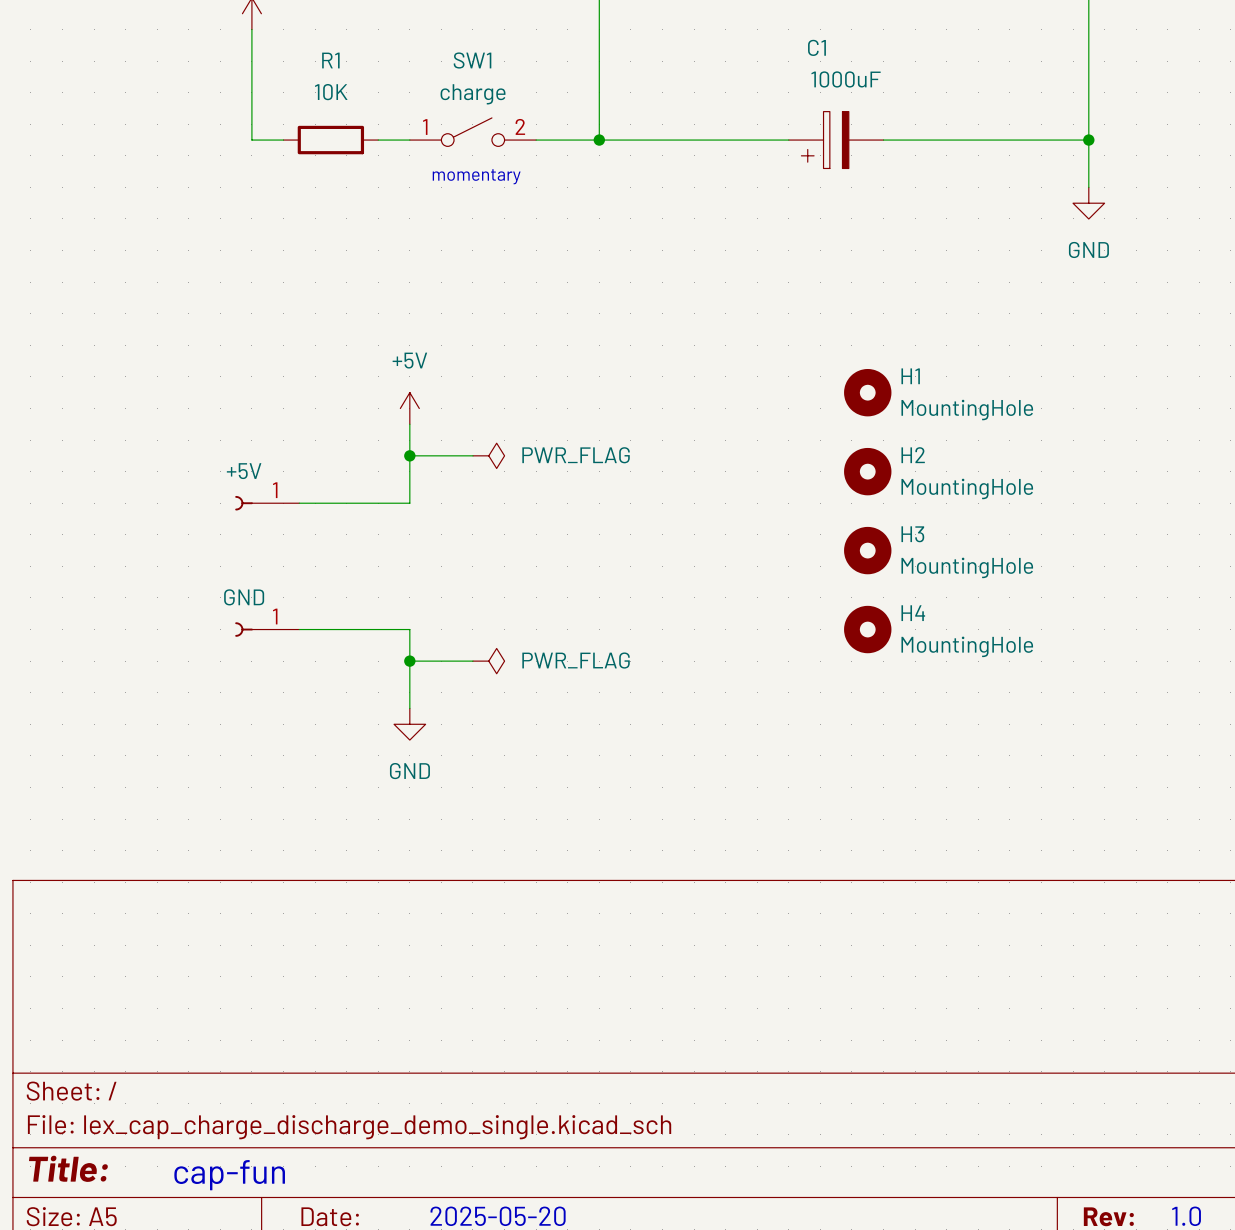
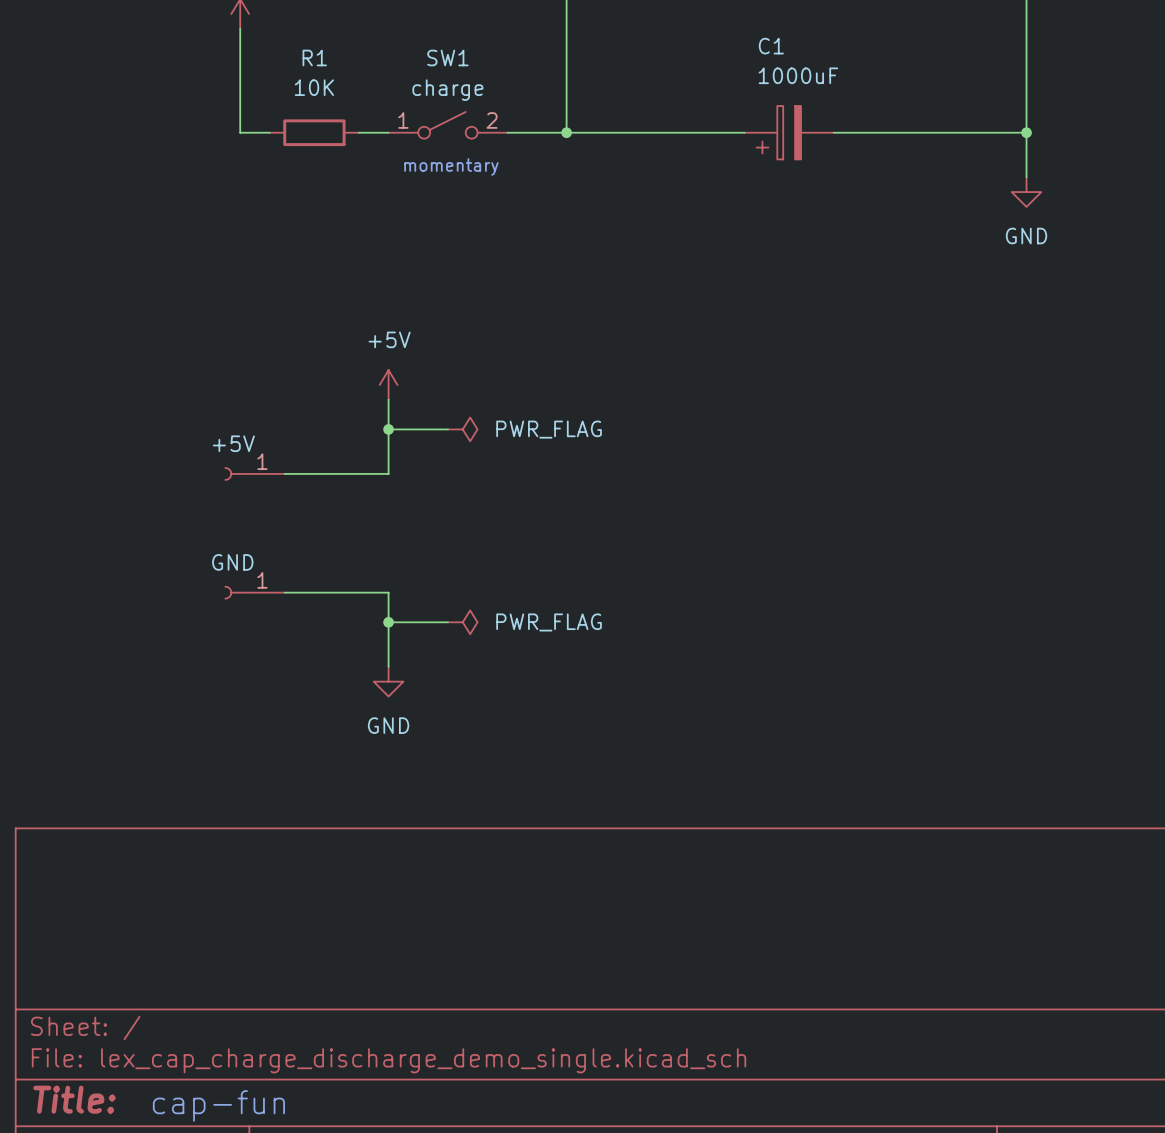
H1: MountingHole (867, 392) -> none
H2: MountingHole (867, 471) -> none
H3: MountingHole (867, 550) -> none
H4: MountingHole (867, 629) -> none

